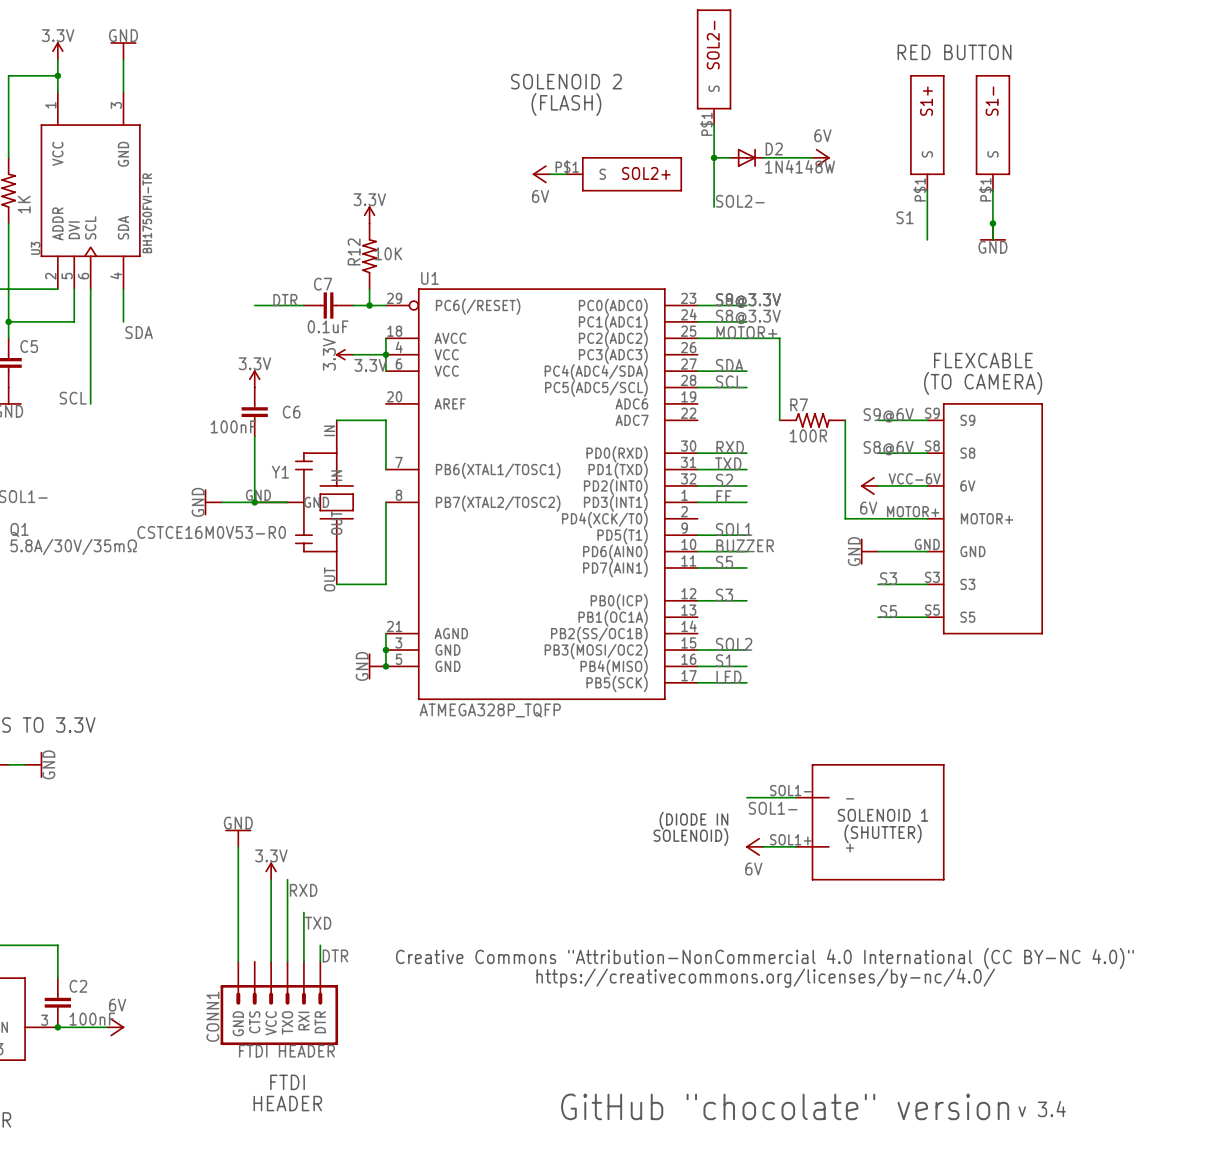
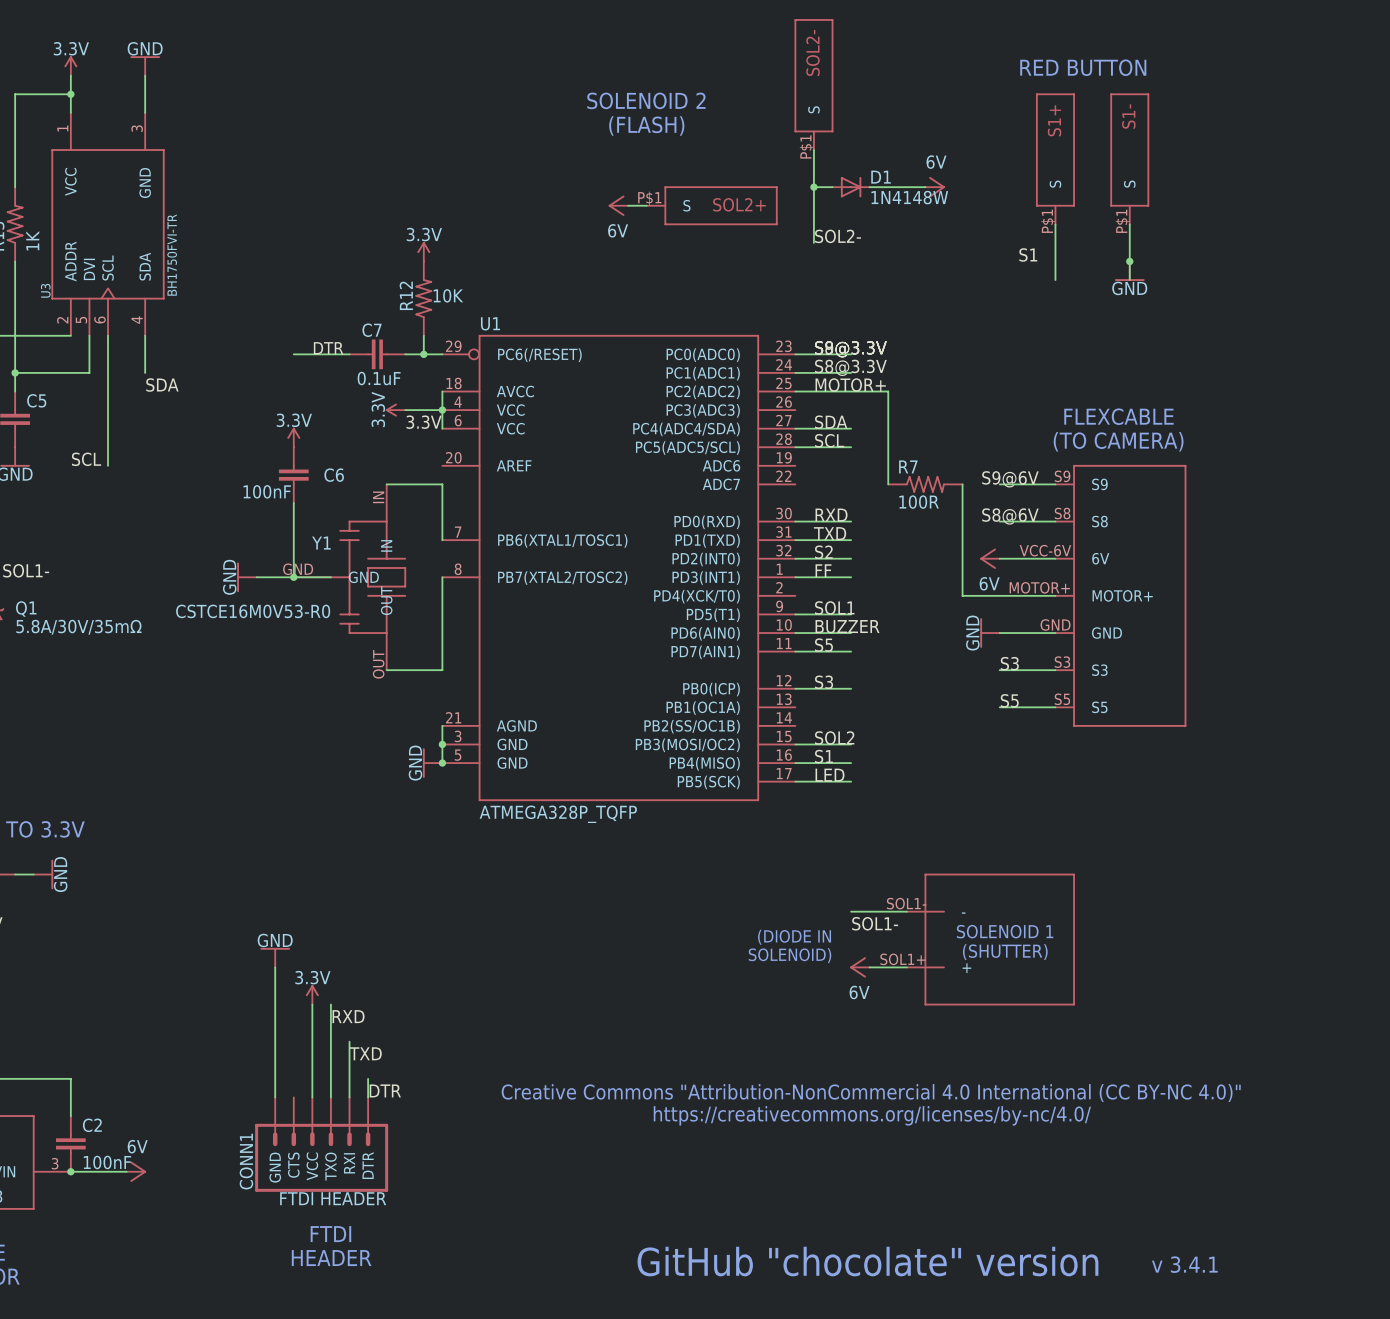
D2 name: D2 (774, 149) -> D1 (881, 177)
text: v 3.4 (1042, 1109) -> v 3.4.1 (1184, 1264)

